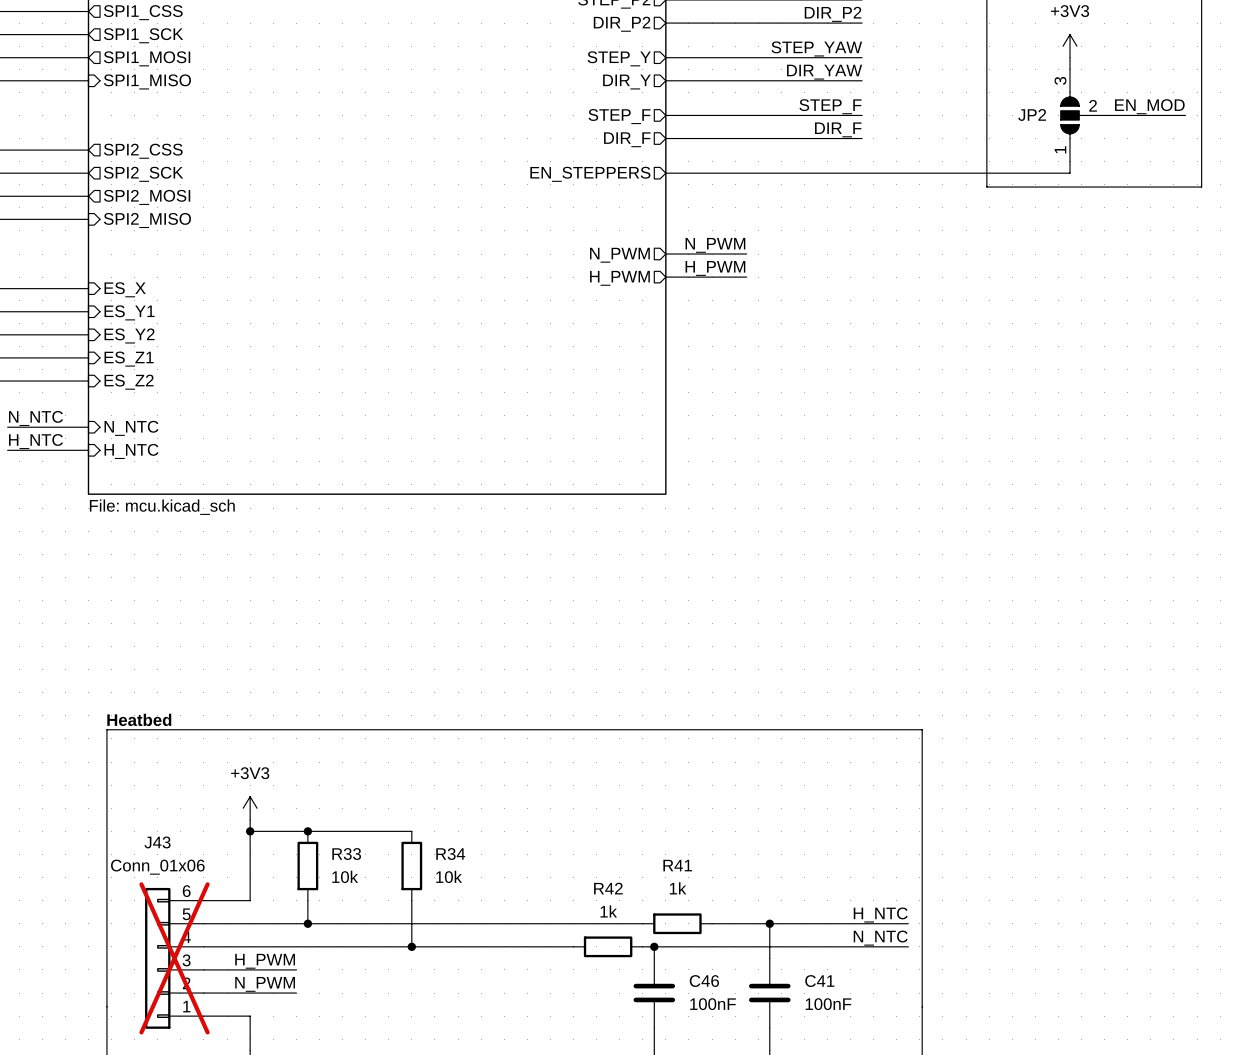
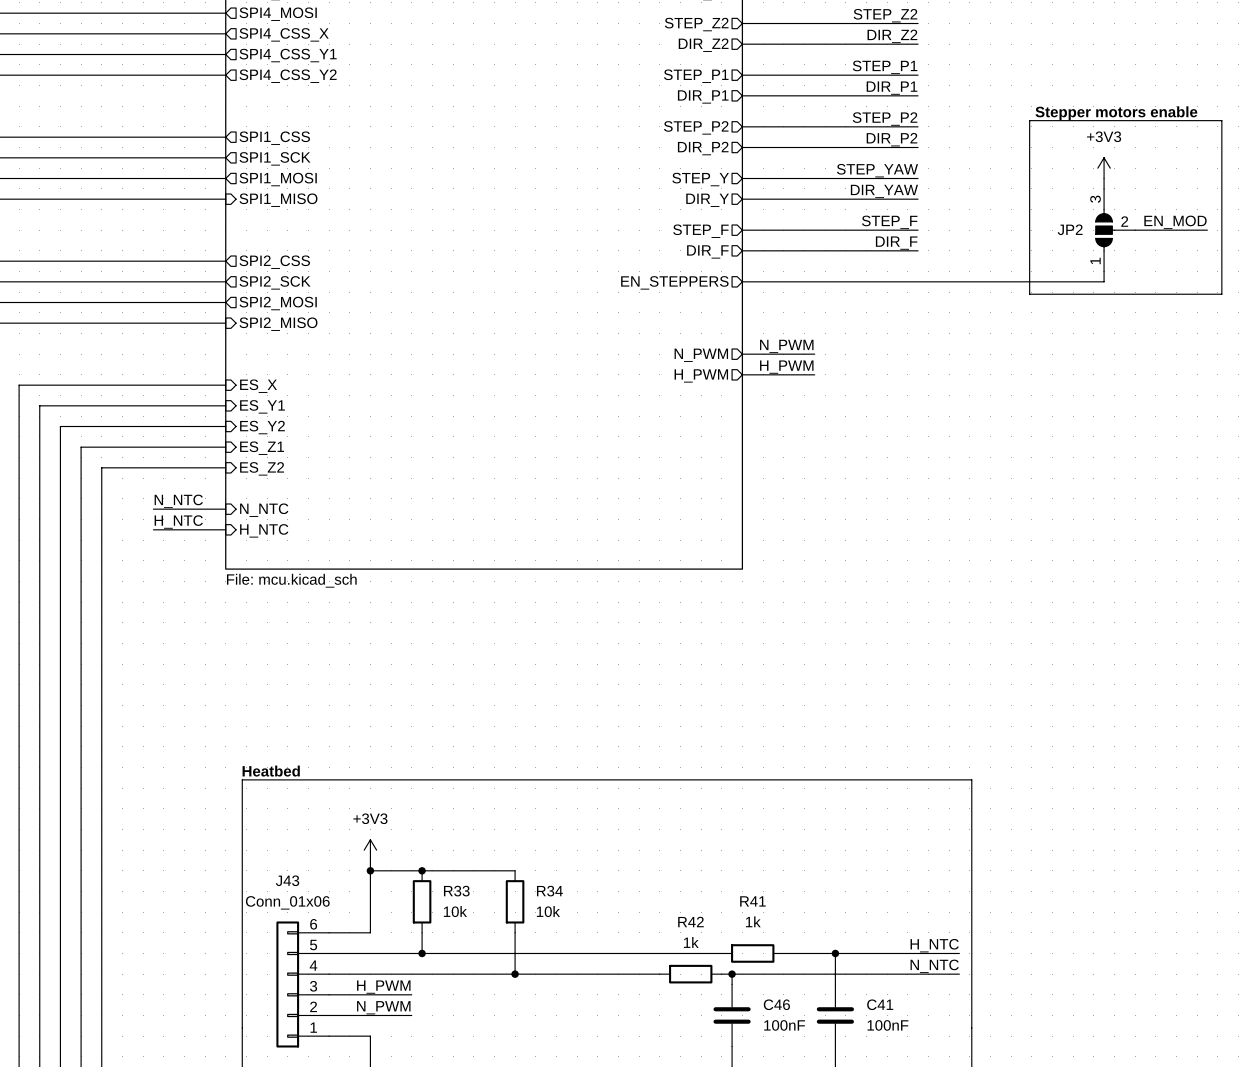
J43 do-not-place cross: (174, 958) -> none

